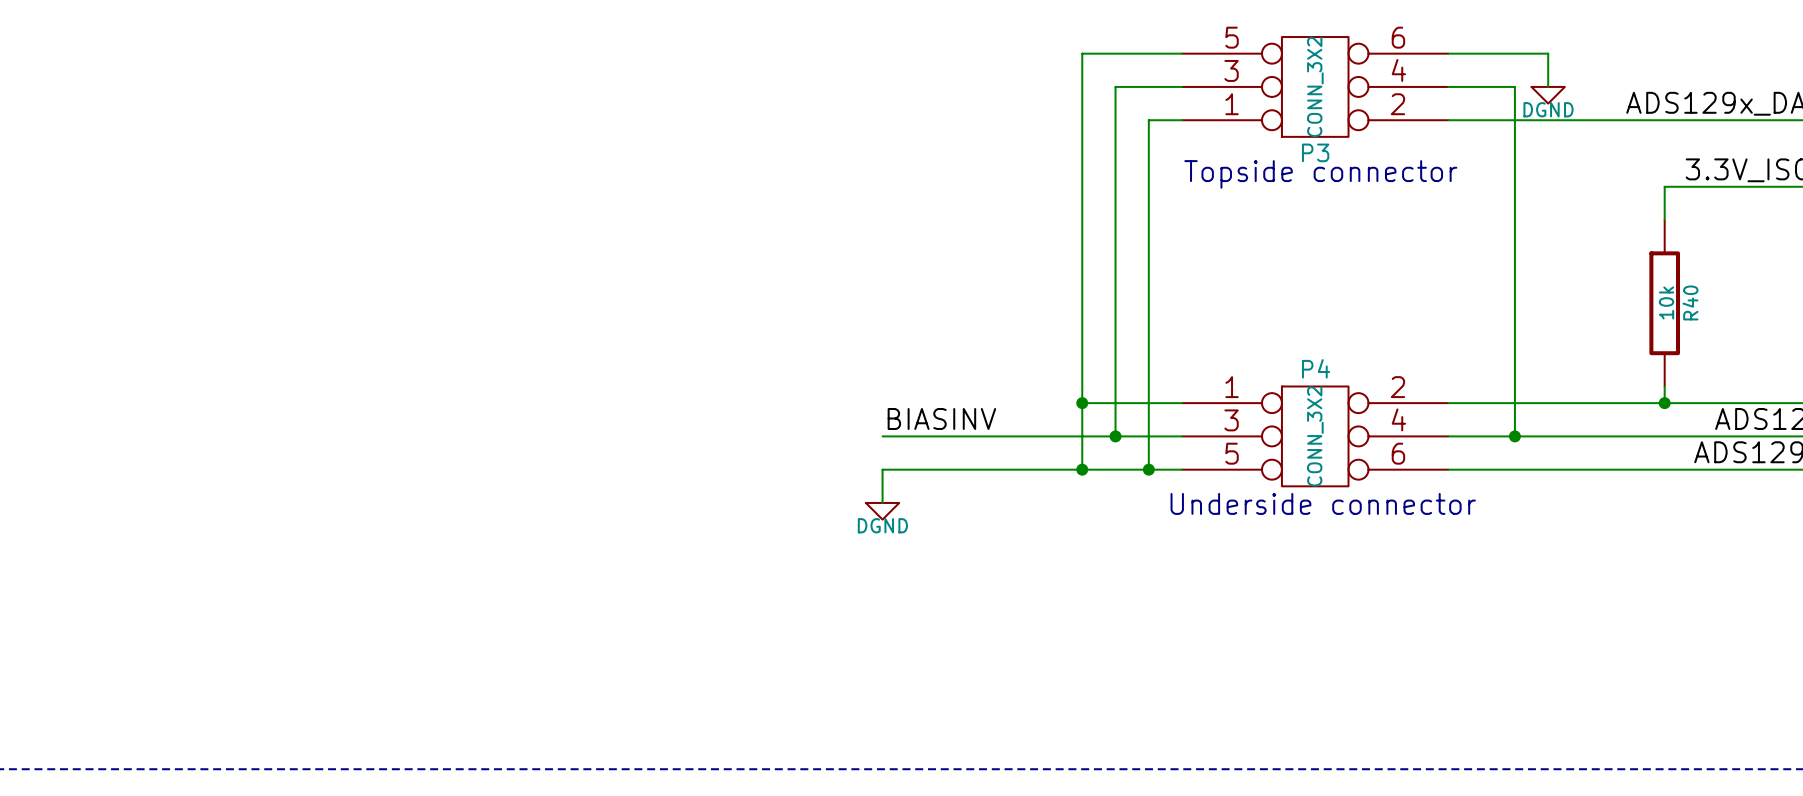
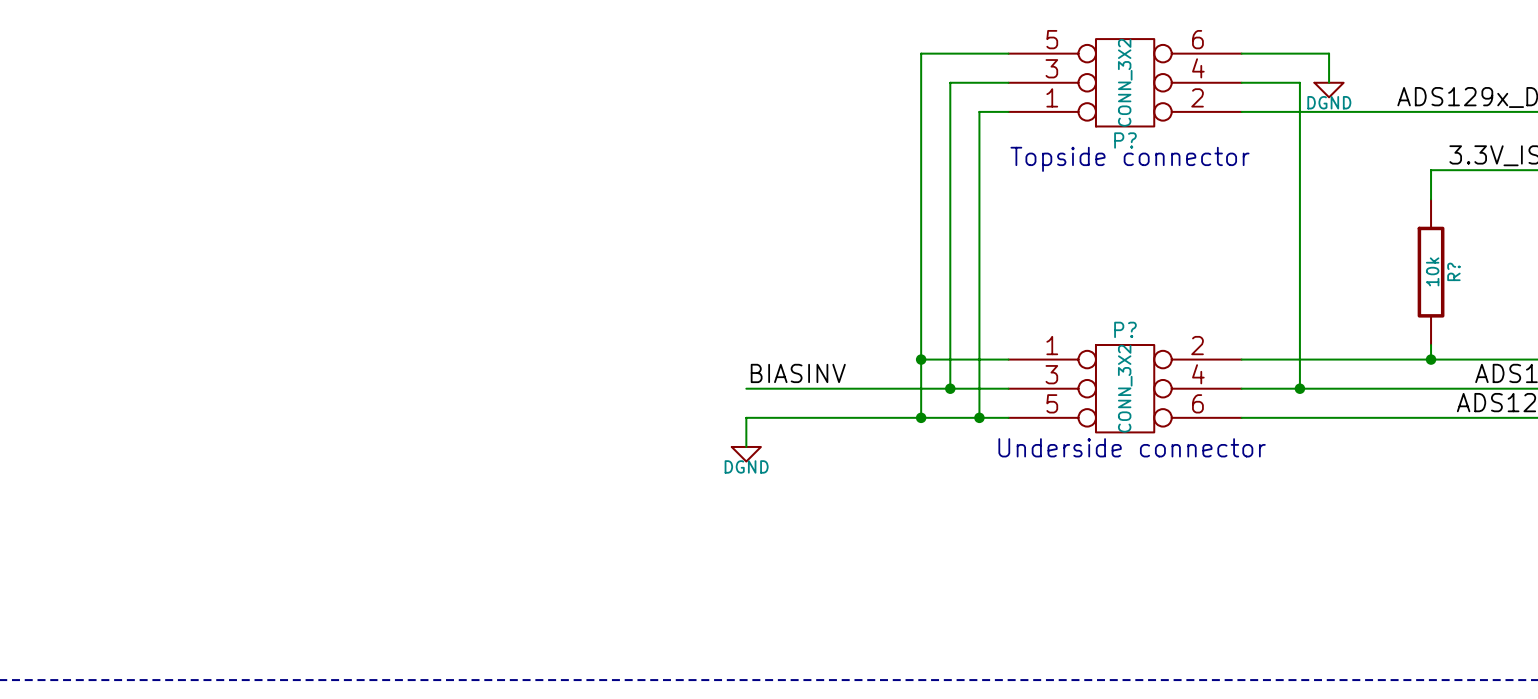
P3 name: P3 (1315, 152) -> P? (1125, 140)
R40 name: R40 (1690, 302) -> R? (1453, 271)
P4 name: P4 (1316, 368) -> P? (1125, 329)

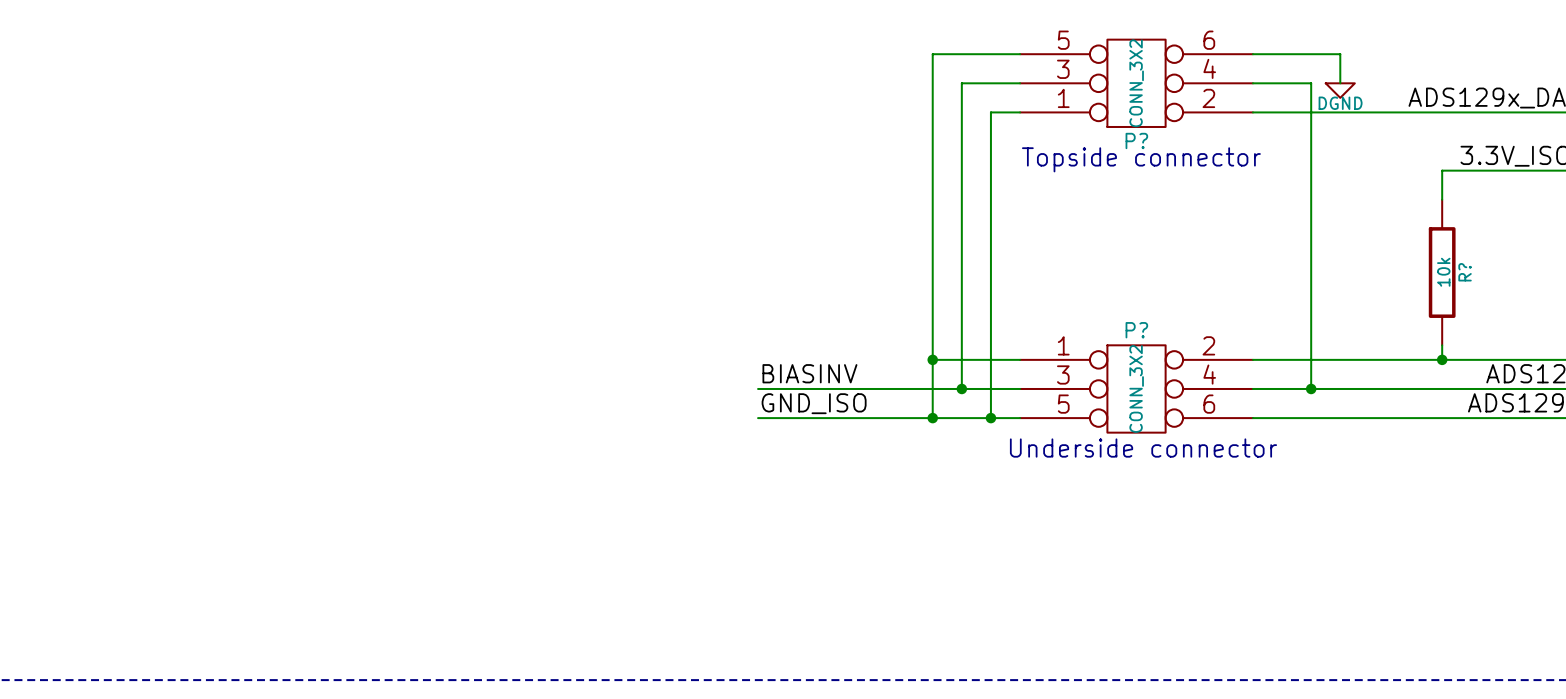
label: none -> GND_ISO (814, 403)
wire: (746, 417) (746, 446) -> none
power symbol: DGND (746, 454) -> none

